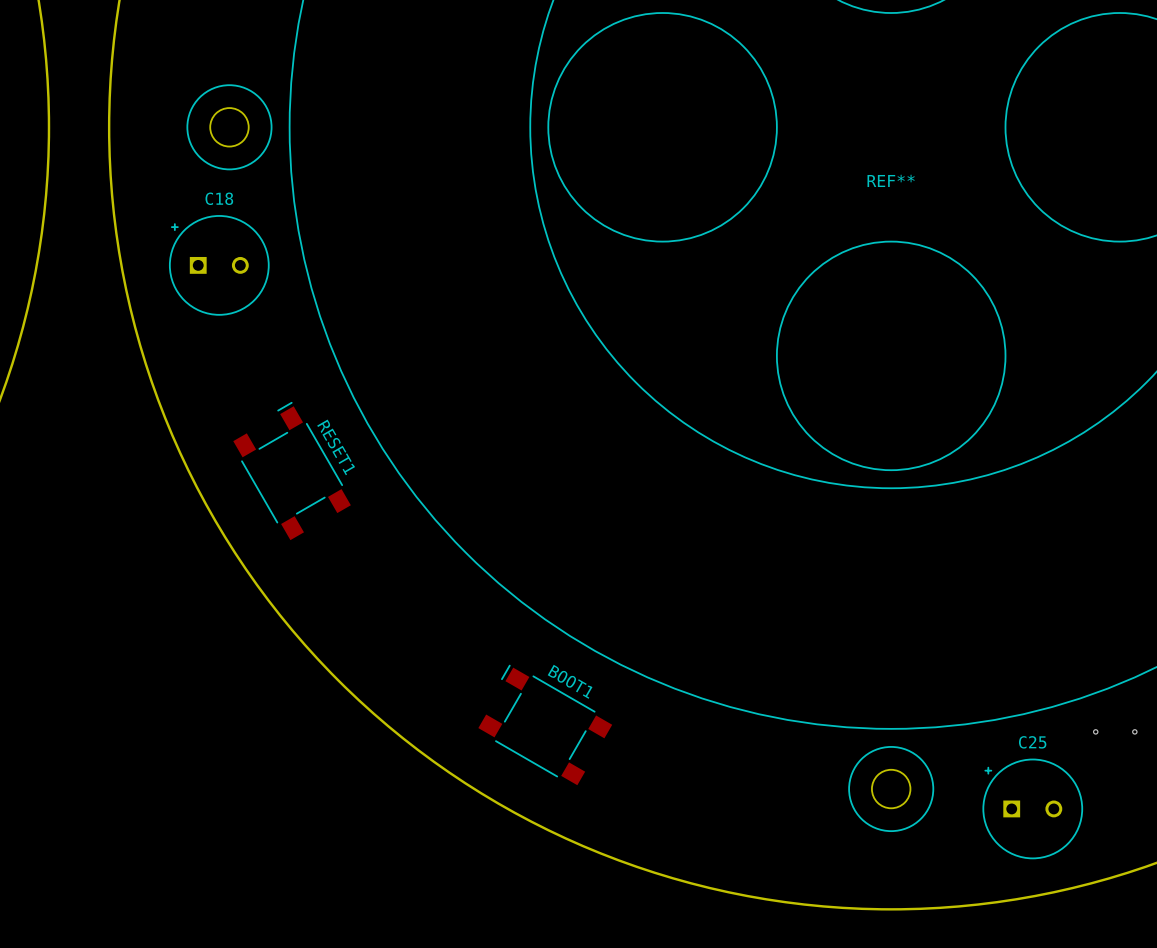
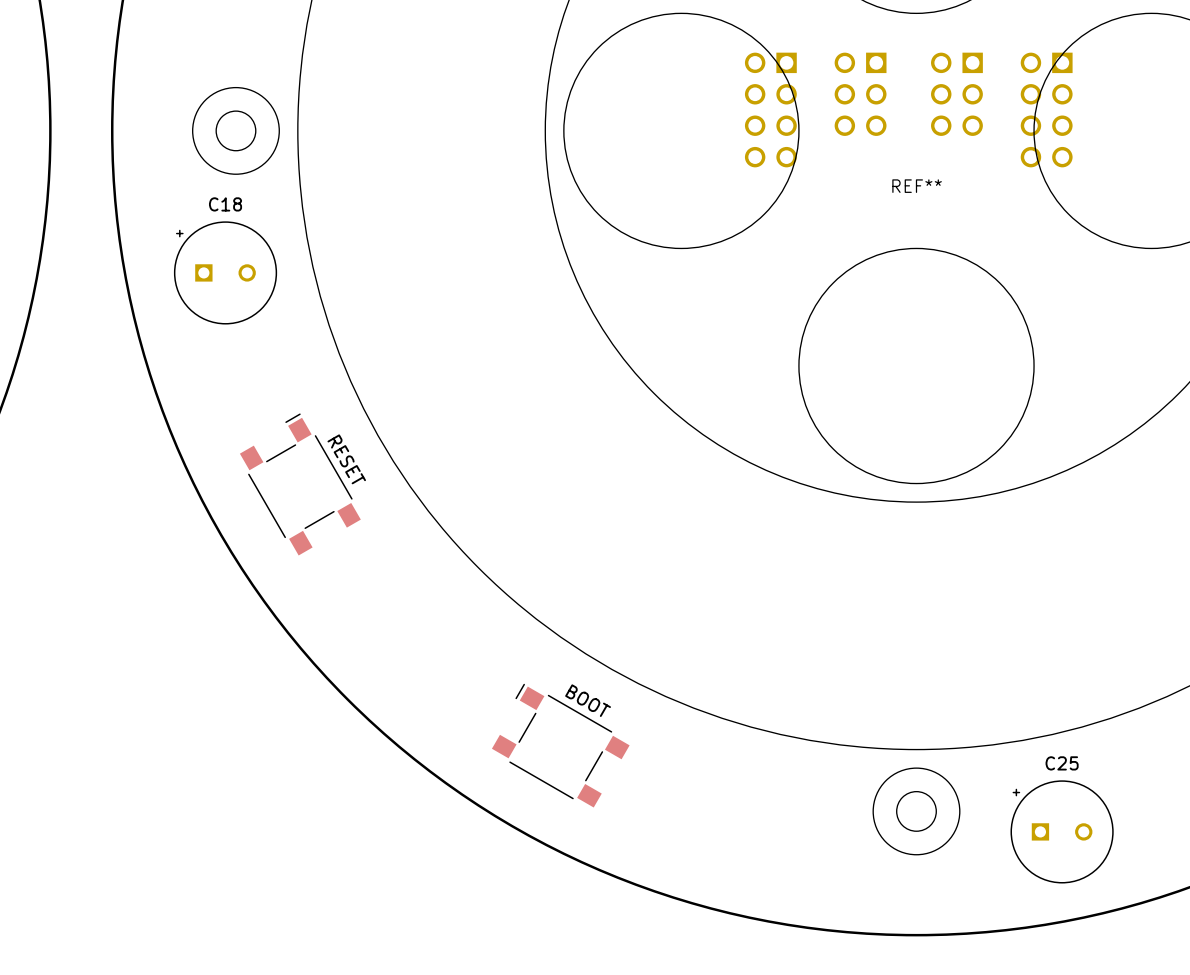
part: none -> (860, 94)
part: none -> (956, 94)
part: none -> (770, 110)
part: none -> (1046, 110)
RESET1 name: RESET1 (336, 447) -> RESET (346, 459)
BOOT1 name: BOOT1 (570, 681) -> BOOT (588, 700)
via: (1095, 731) -> none
via: (1134, 731) -> none

